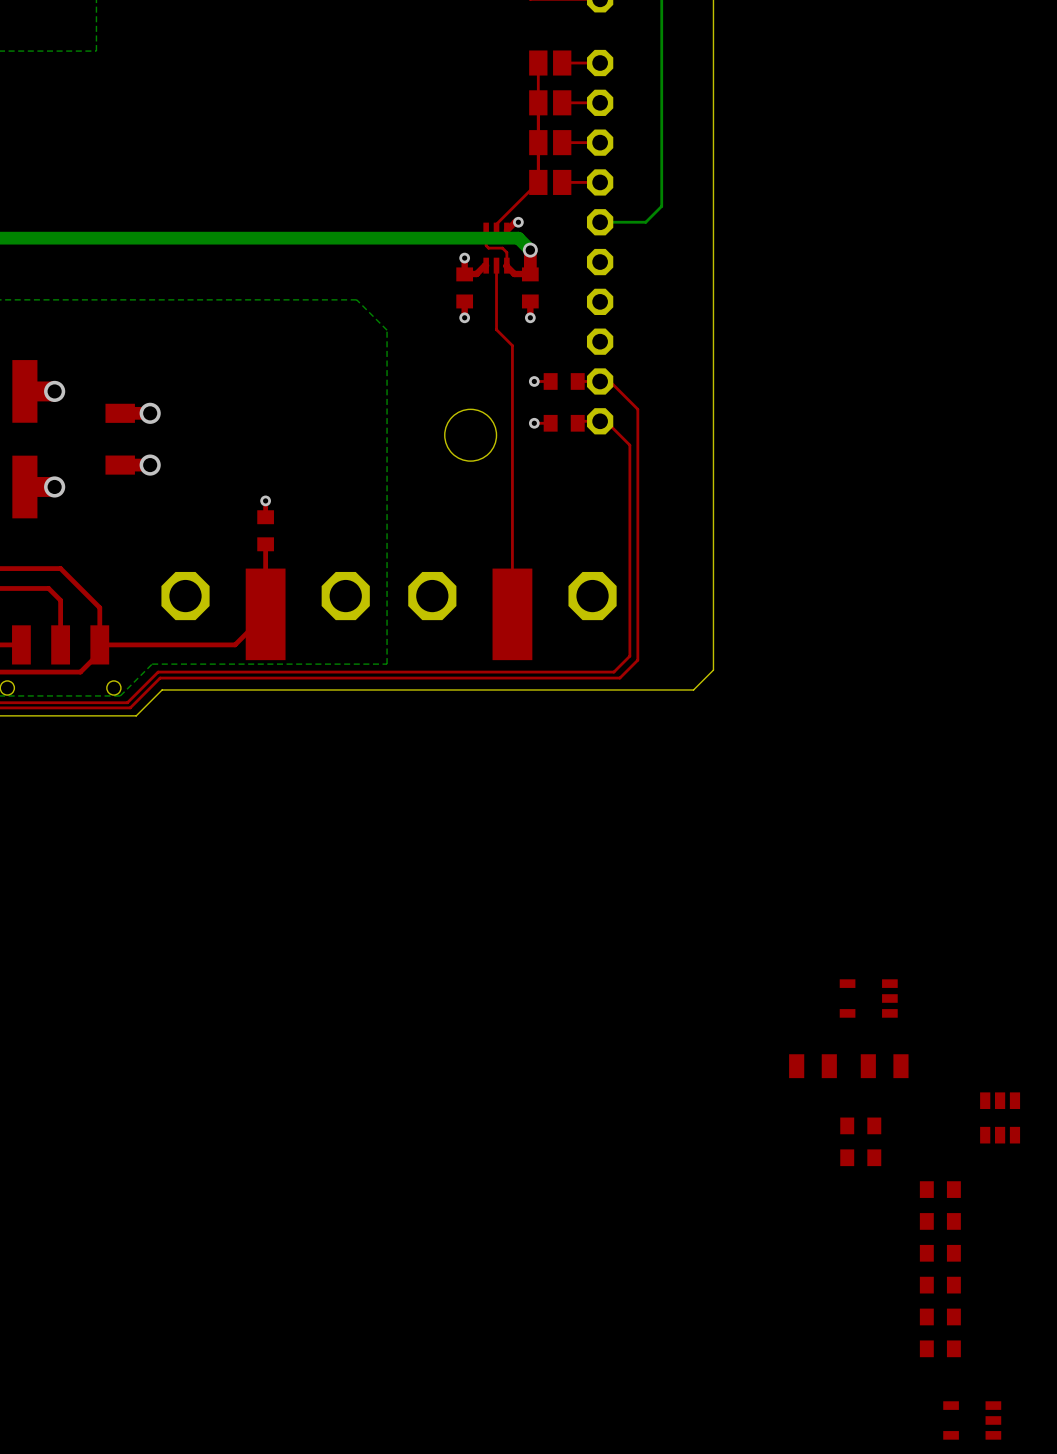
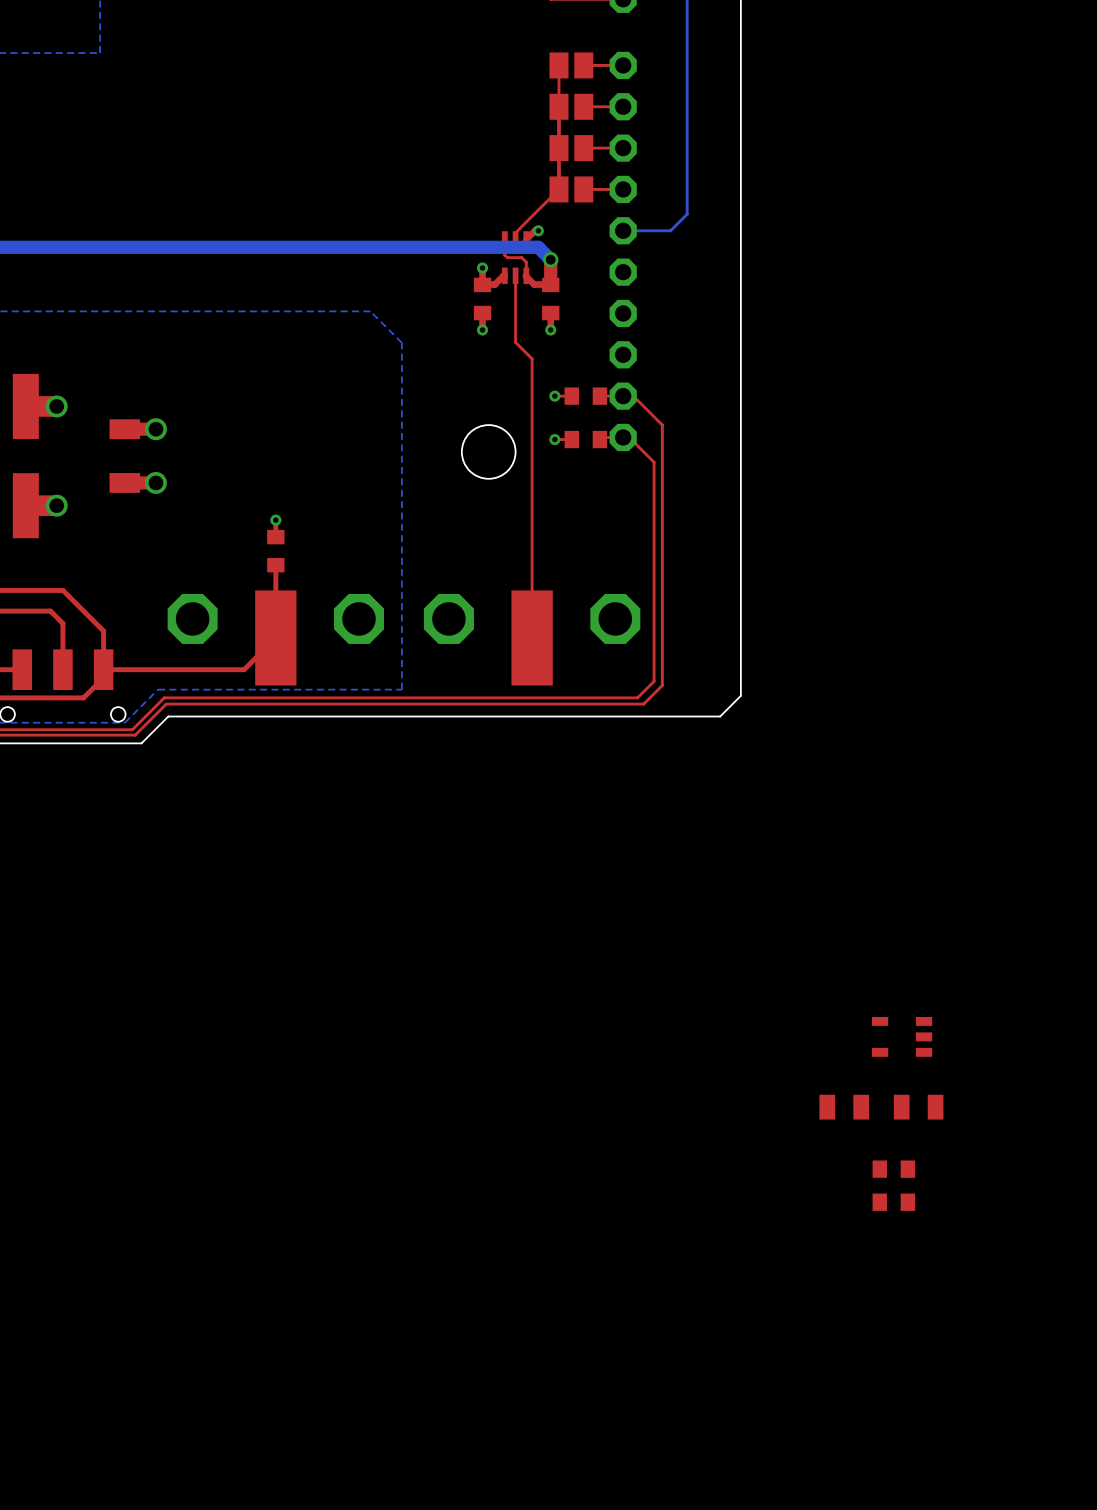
part: (1000, 1117) -> none
part: (940, 1189) -> none
part: (940, 1221) -> none
part: (940, 1253) -> none
part: (940, 1285) -> none
part: (940, 1316) -> none
part: (940, 1348) -> none
part: (972, 1420) -> none

